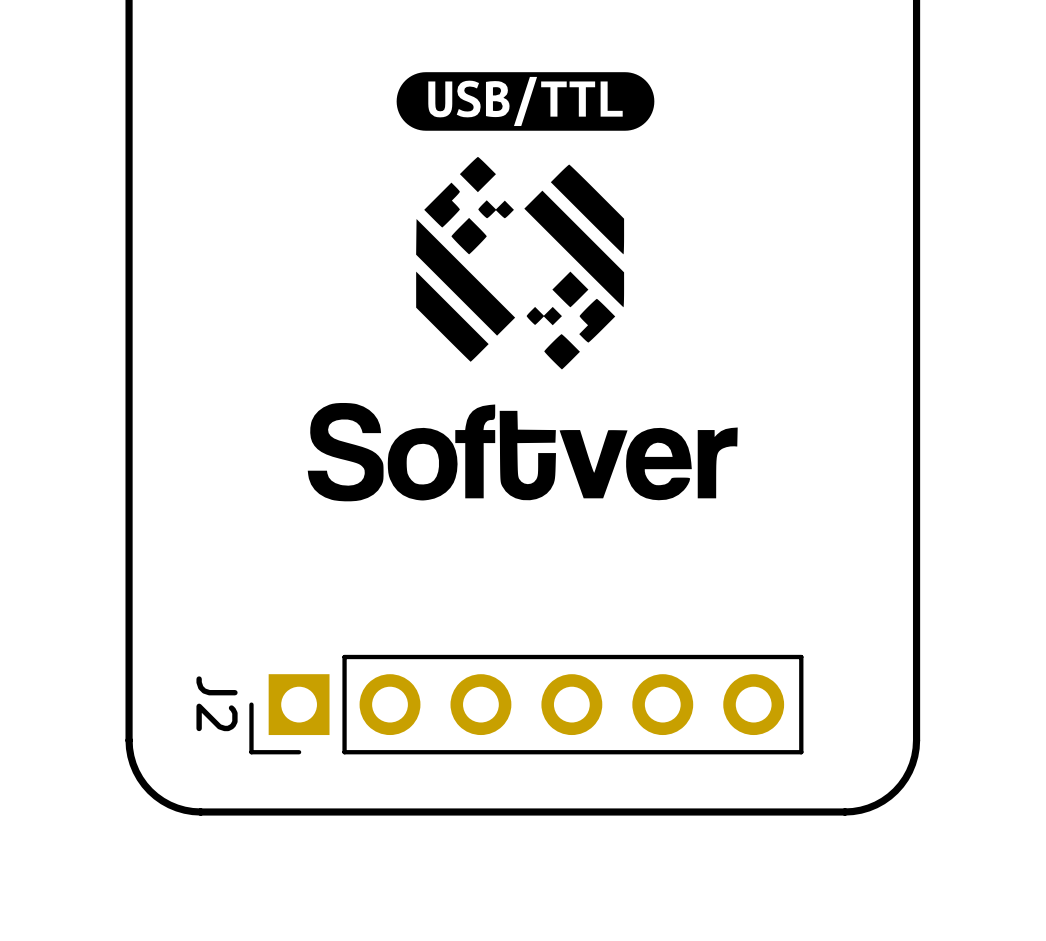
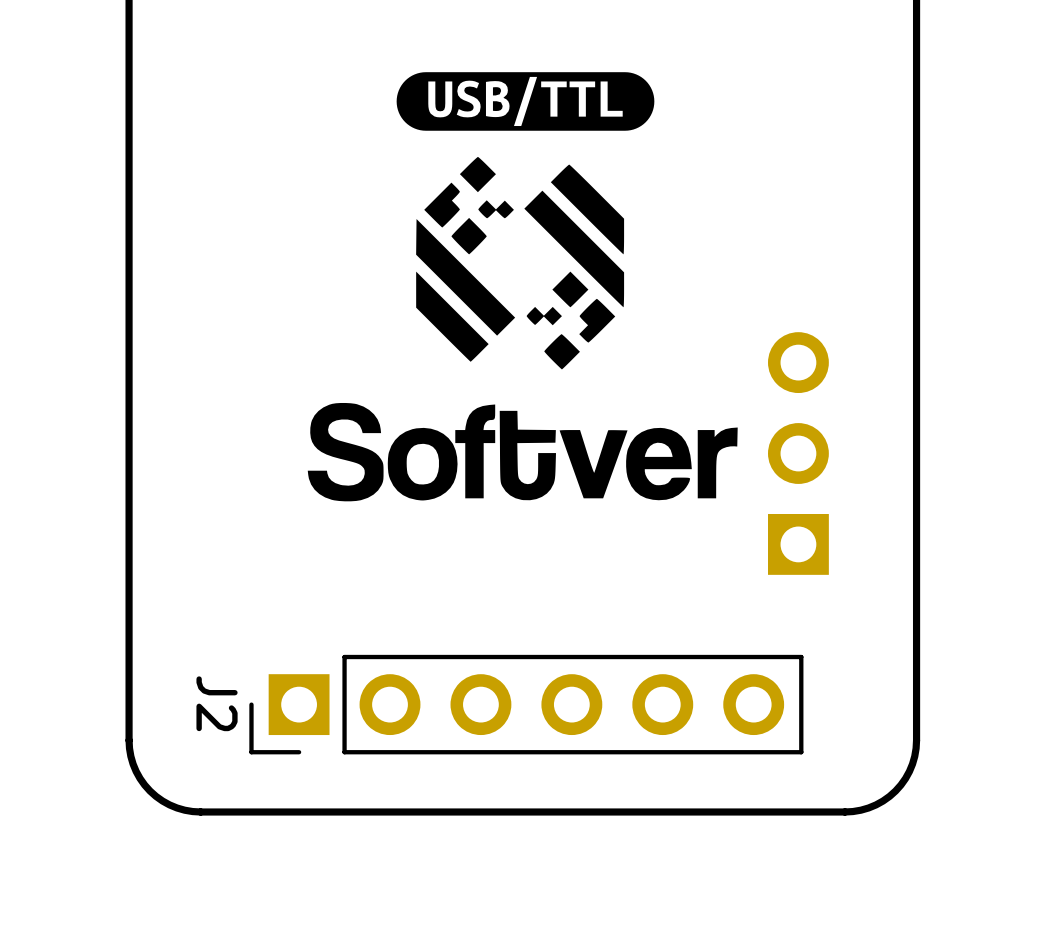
part: none -> (798, 453)

